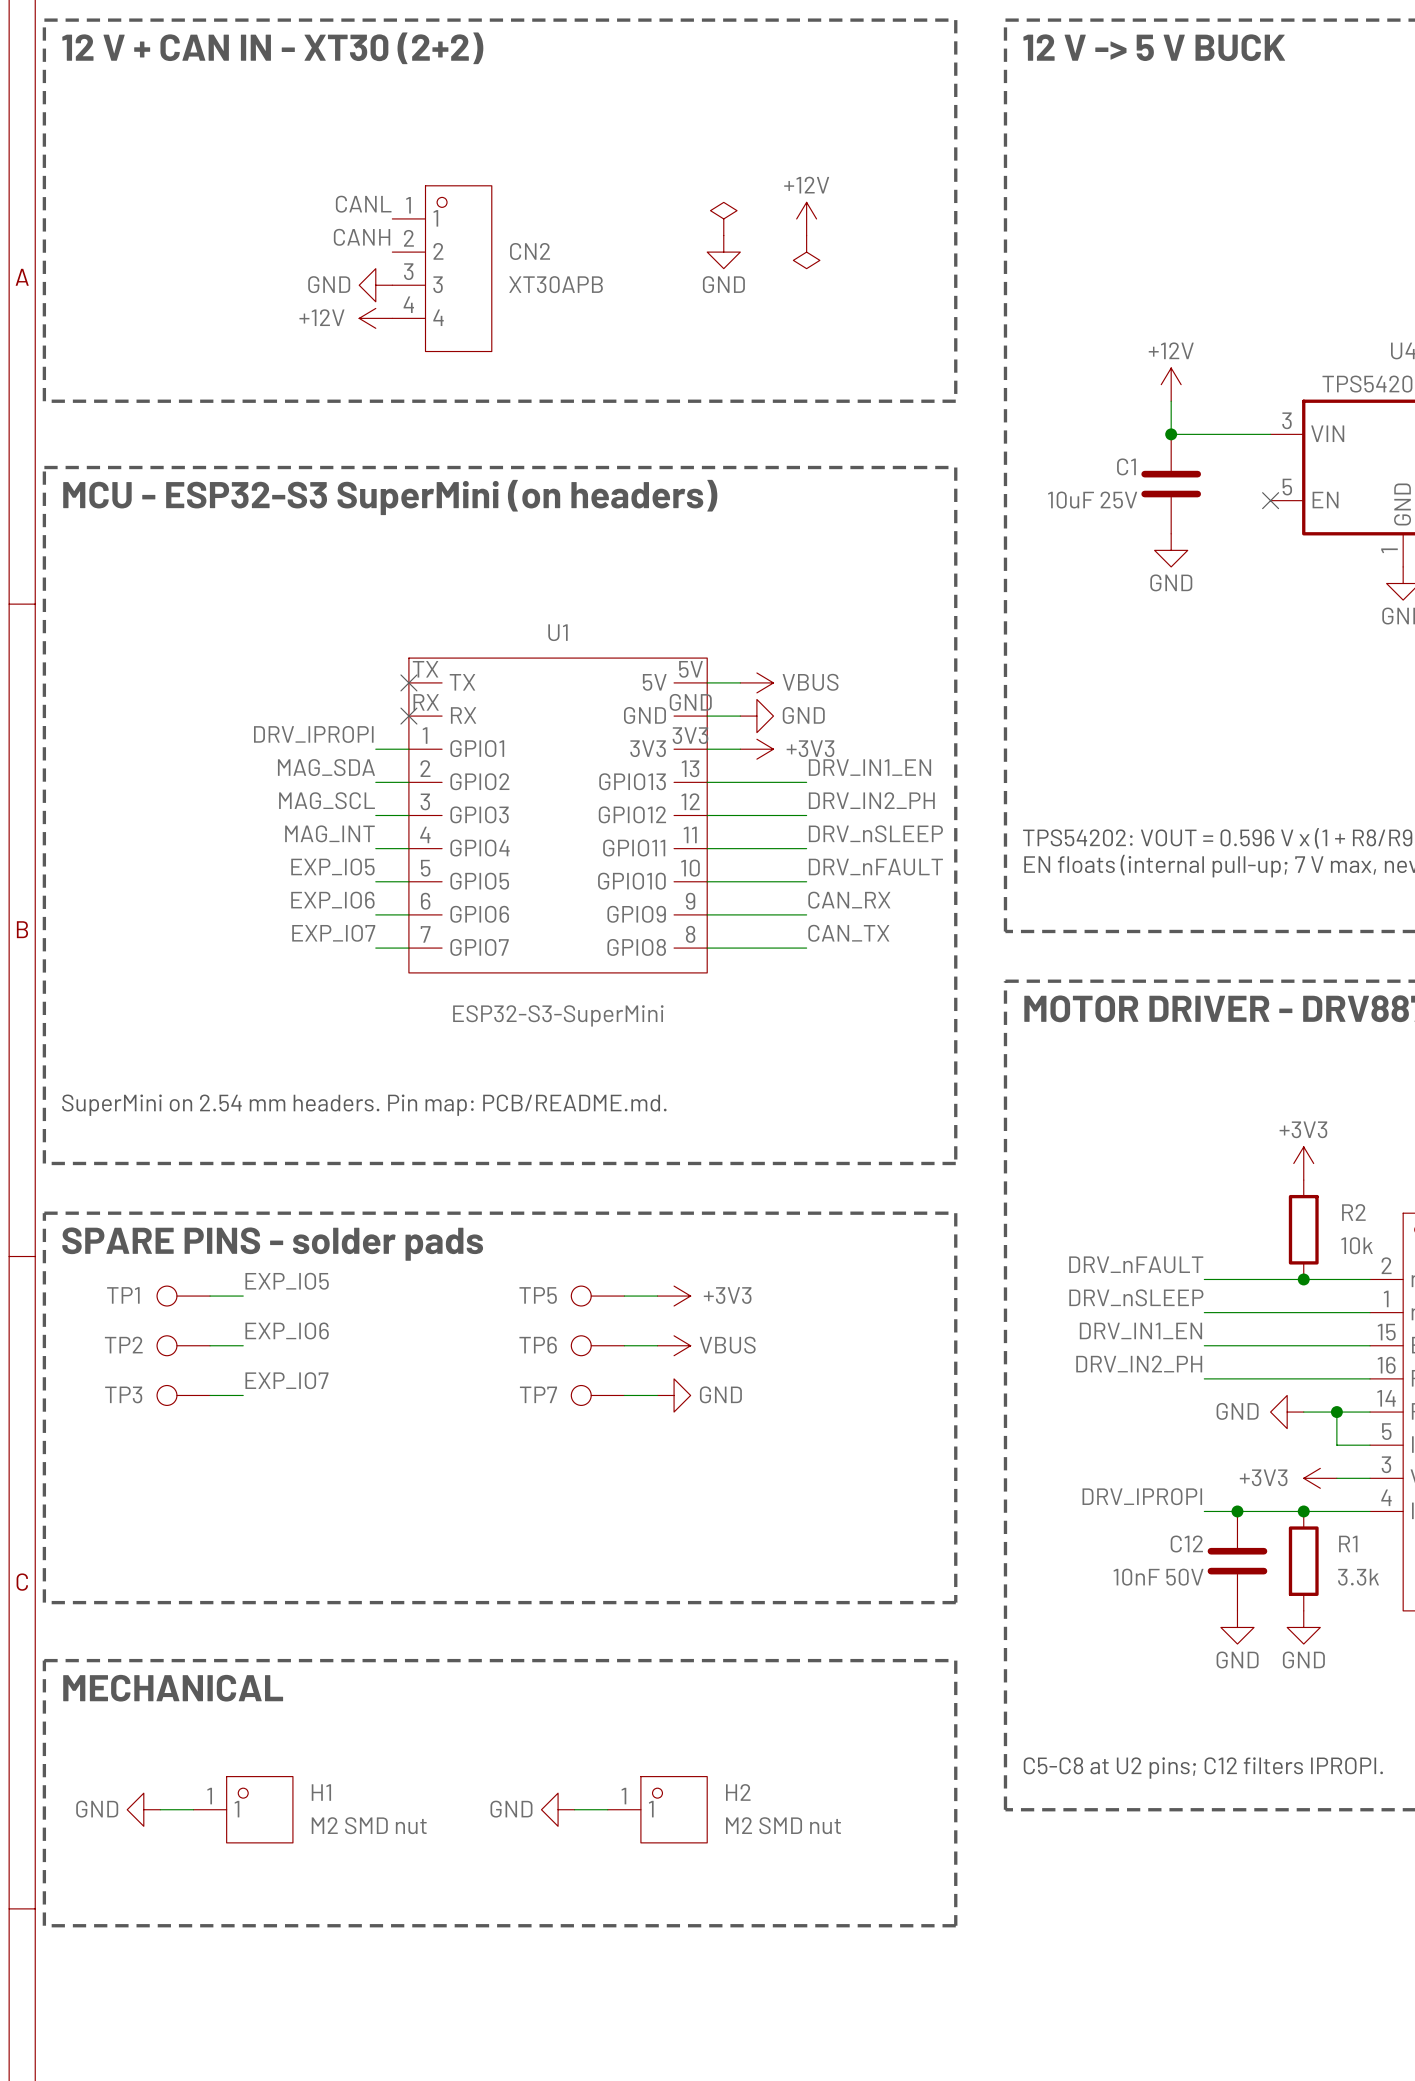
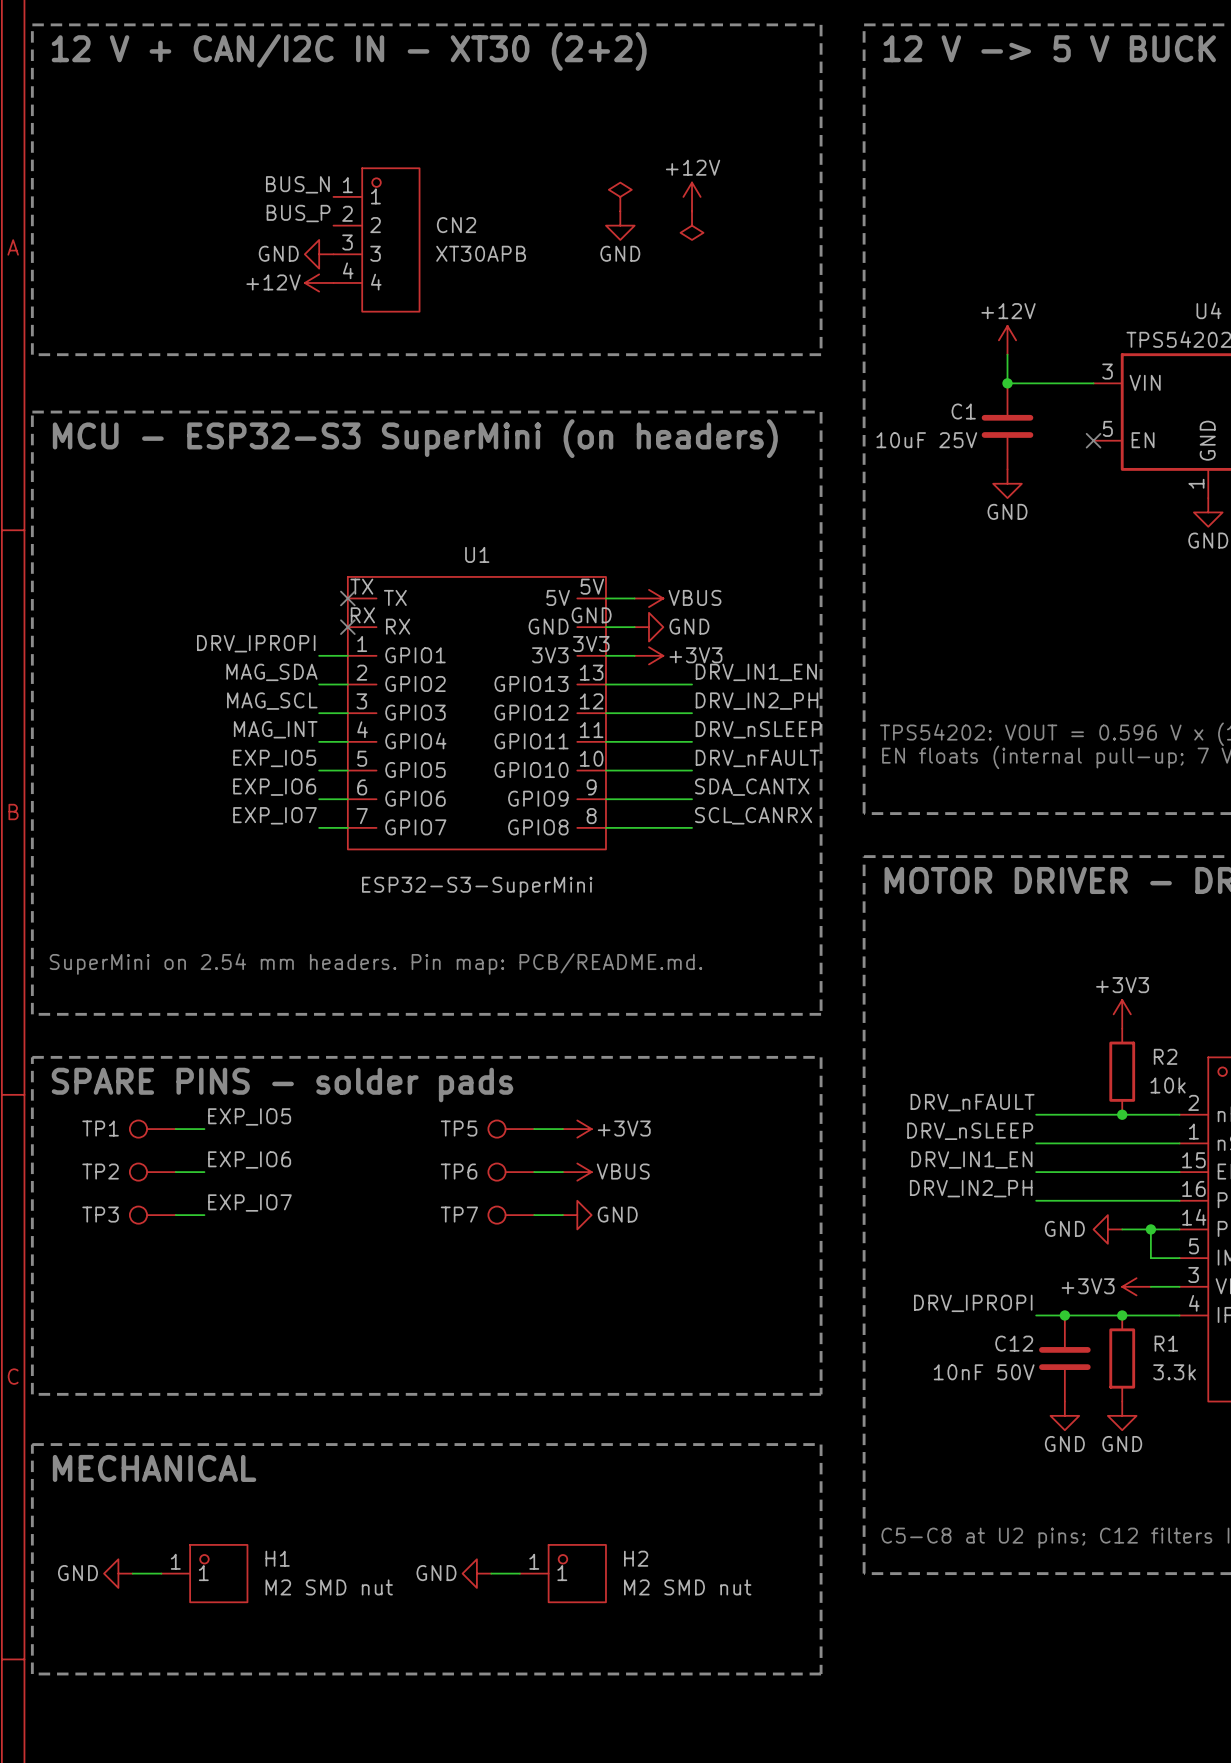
text: 12 V + CAN IN - XT30 (2+2) (272, 48) -> 12 V + CAN/I2C IN - XT30 (2+2) (349, 51)
label: CANL (363, 204) -> BUS_N (297, 184)
label: CANH (362, 237) -> BUS_P (298, 213)
label: CAN_RX (849, 900) -> SDA_CANTX (752, 787)
label: CAN_TX (848, 933) -> SCL_CANRX (753, 815)

